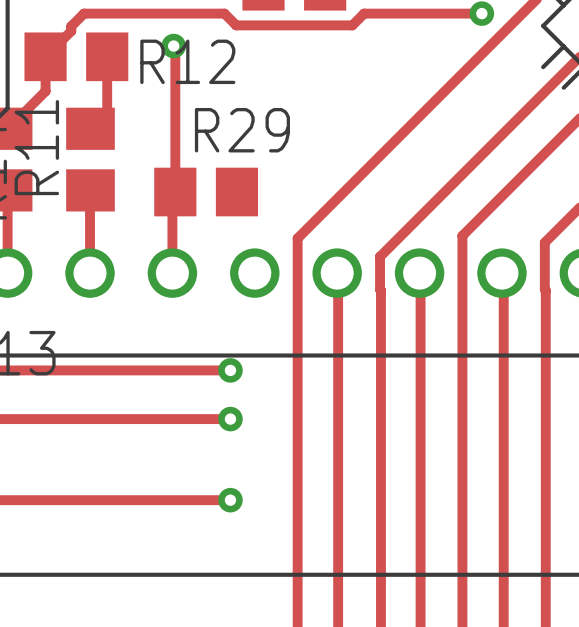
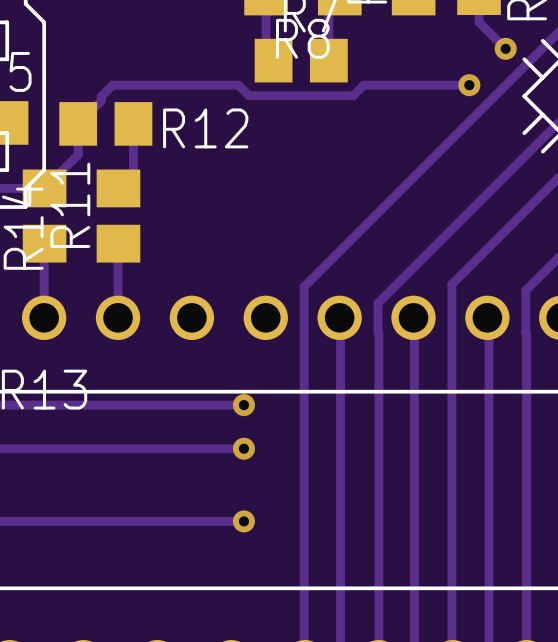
track: (173, 46) (175, 47) (175, 192) (172, 194) (172, 273) -> none
via: (173, 46) -> none
R29: (206, 192) -> none

